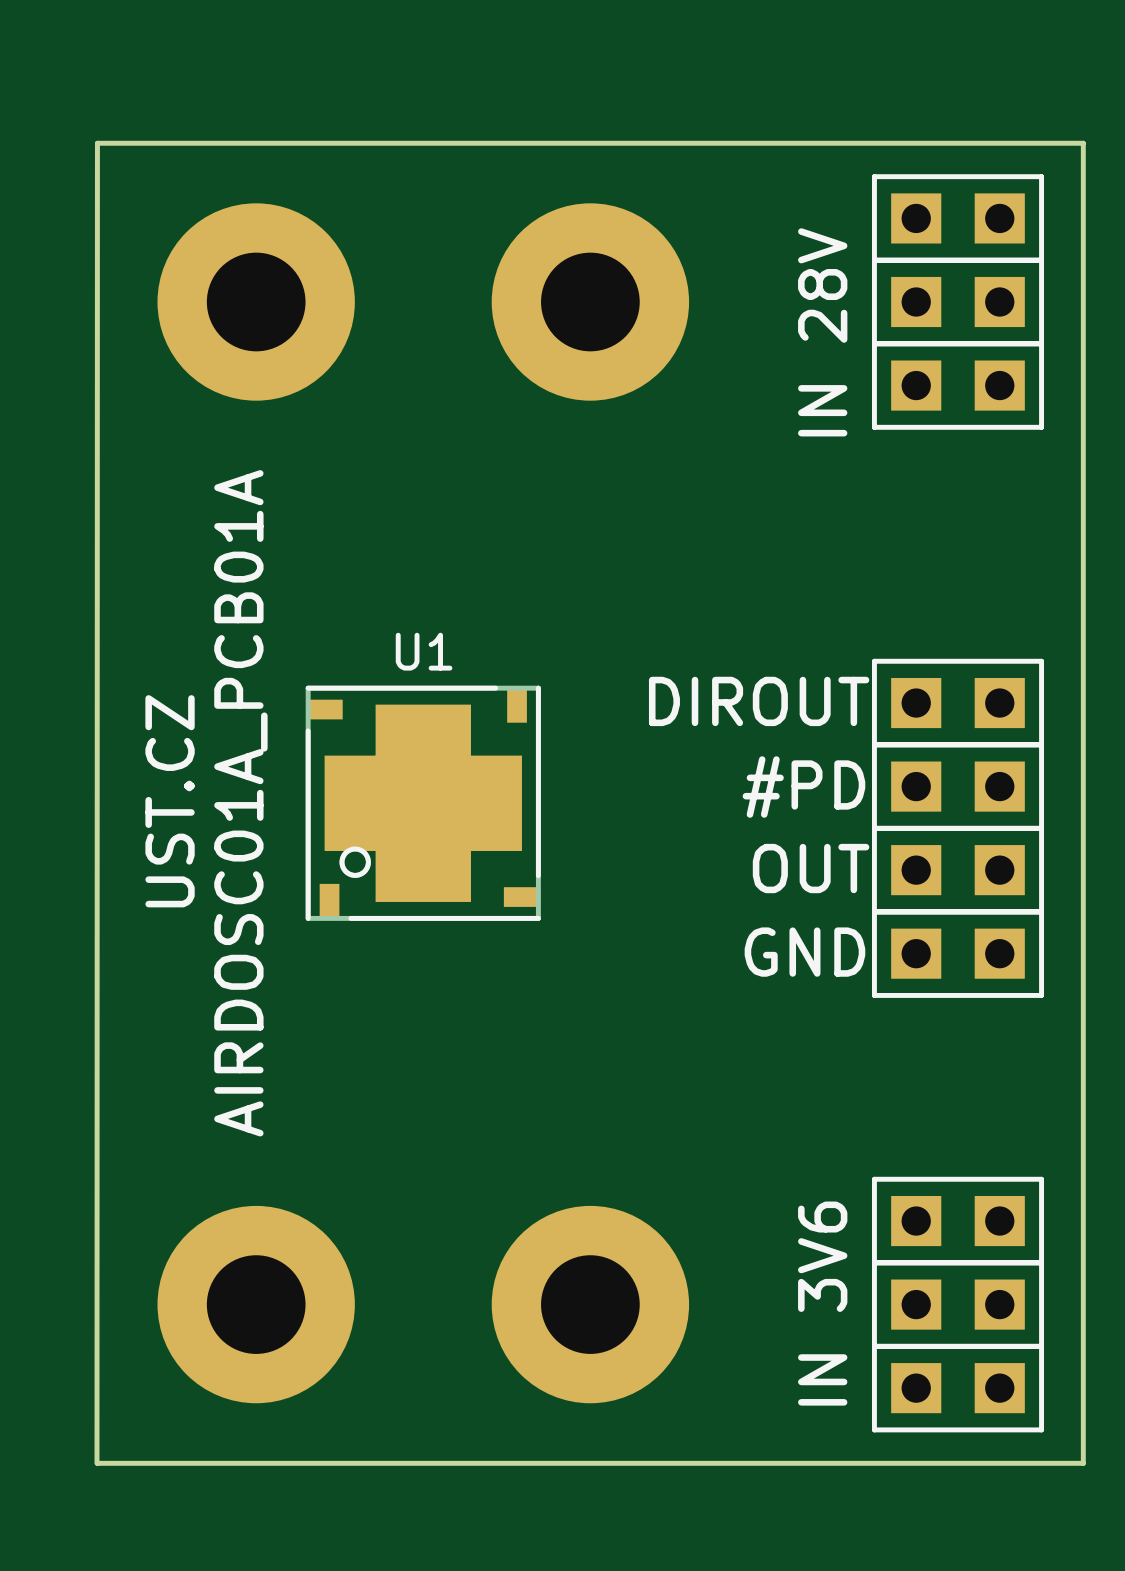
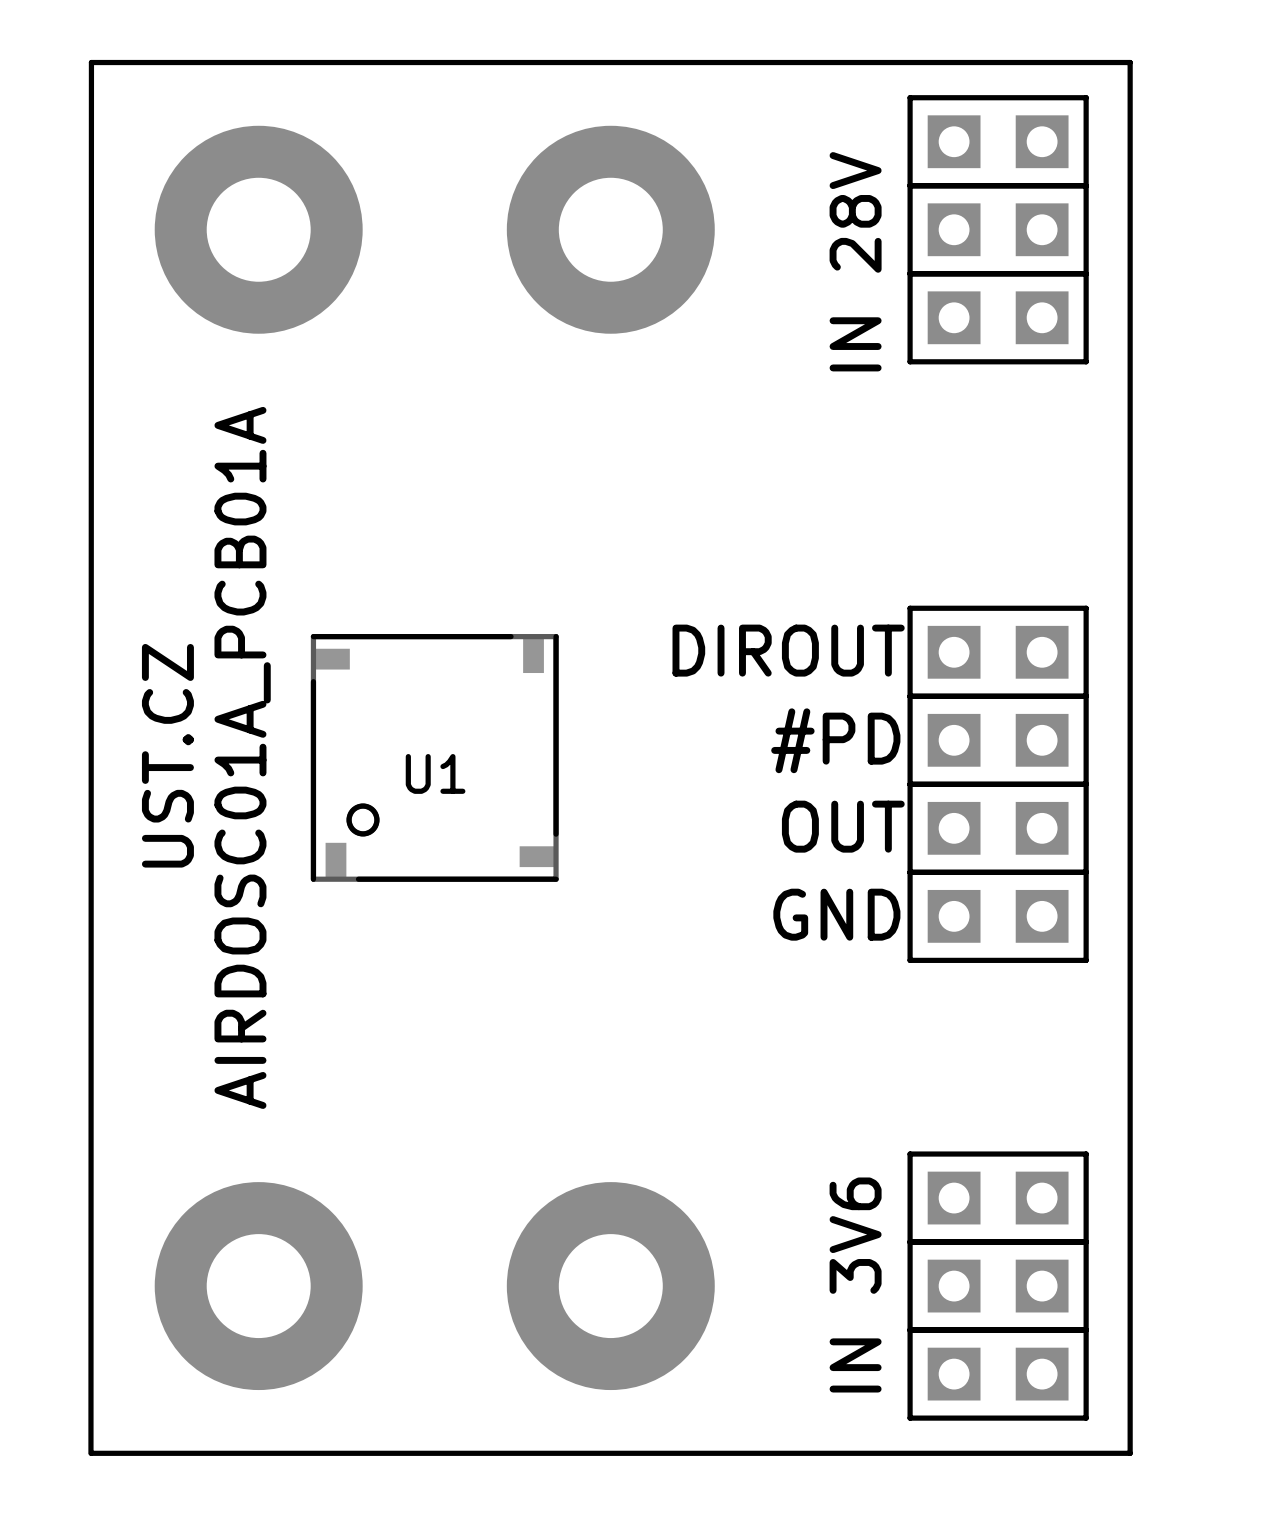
U1 name position: U1 (424, 651) -> U1 (435, 773)
U1 footprint: [305, 685, 541, 921] -> [310, 634, 559, 882]

